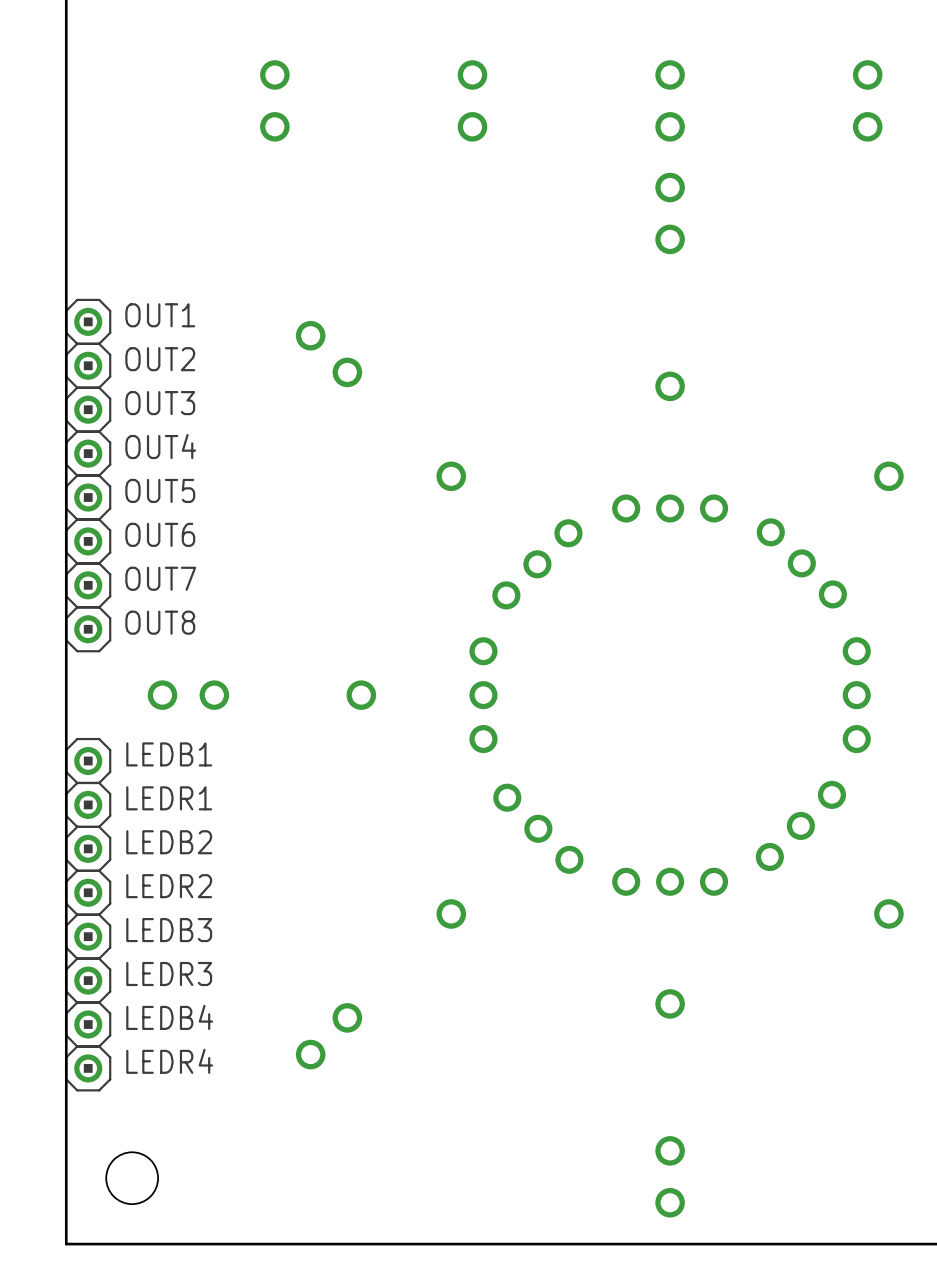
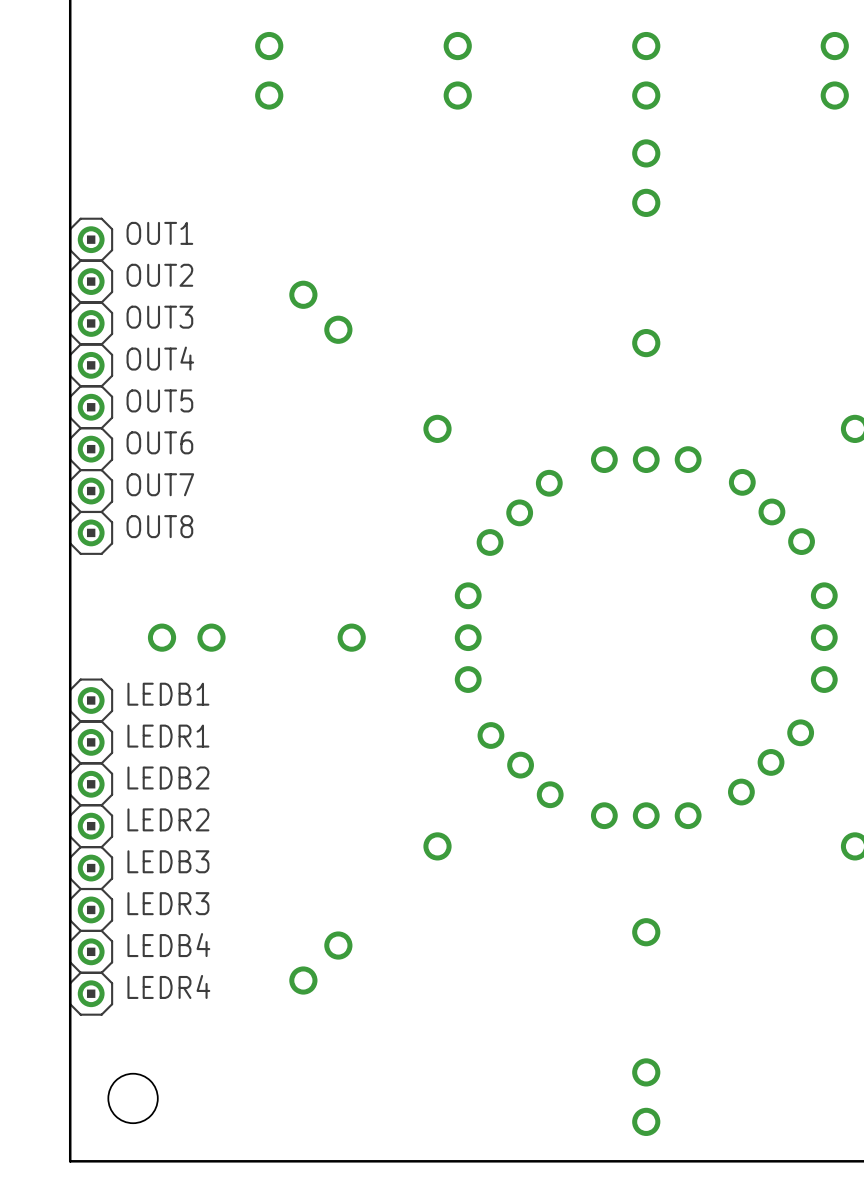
OUT1: none -> (91, 239)
OUT1 name: OUT1 (160, 315) -> OUT2 (159, 275)
OUT2 name: OUT2 (160, 359) -> OUT3 (159, 317)
OUT3 name: OUT3 (160, 403) -> OUT4 (160, 358)
OUT4 name: OUT4 (160, 446) -> OUT5 (159, 400)
OUT5 name: OUT5 (160, 490) -> OUT6 (159, 442)
OUT6 name: OUT6 (160, 534) -> OUT7 (160, 484)
OUT7 name: OUT7 (160, 578) -> OUT8 (159, 526)
OUT8: (88, 629) -> none

